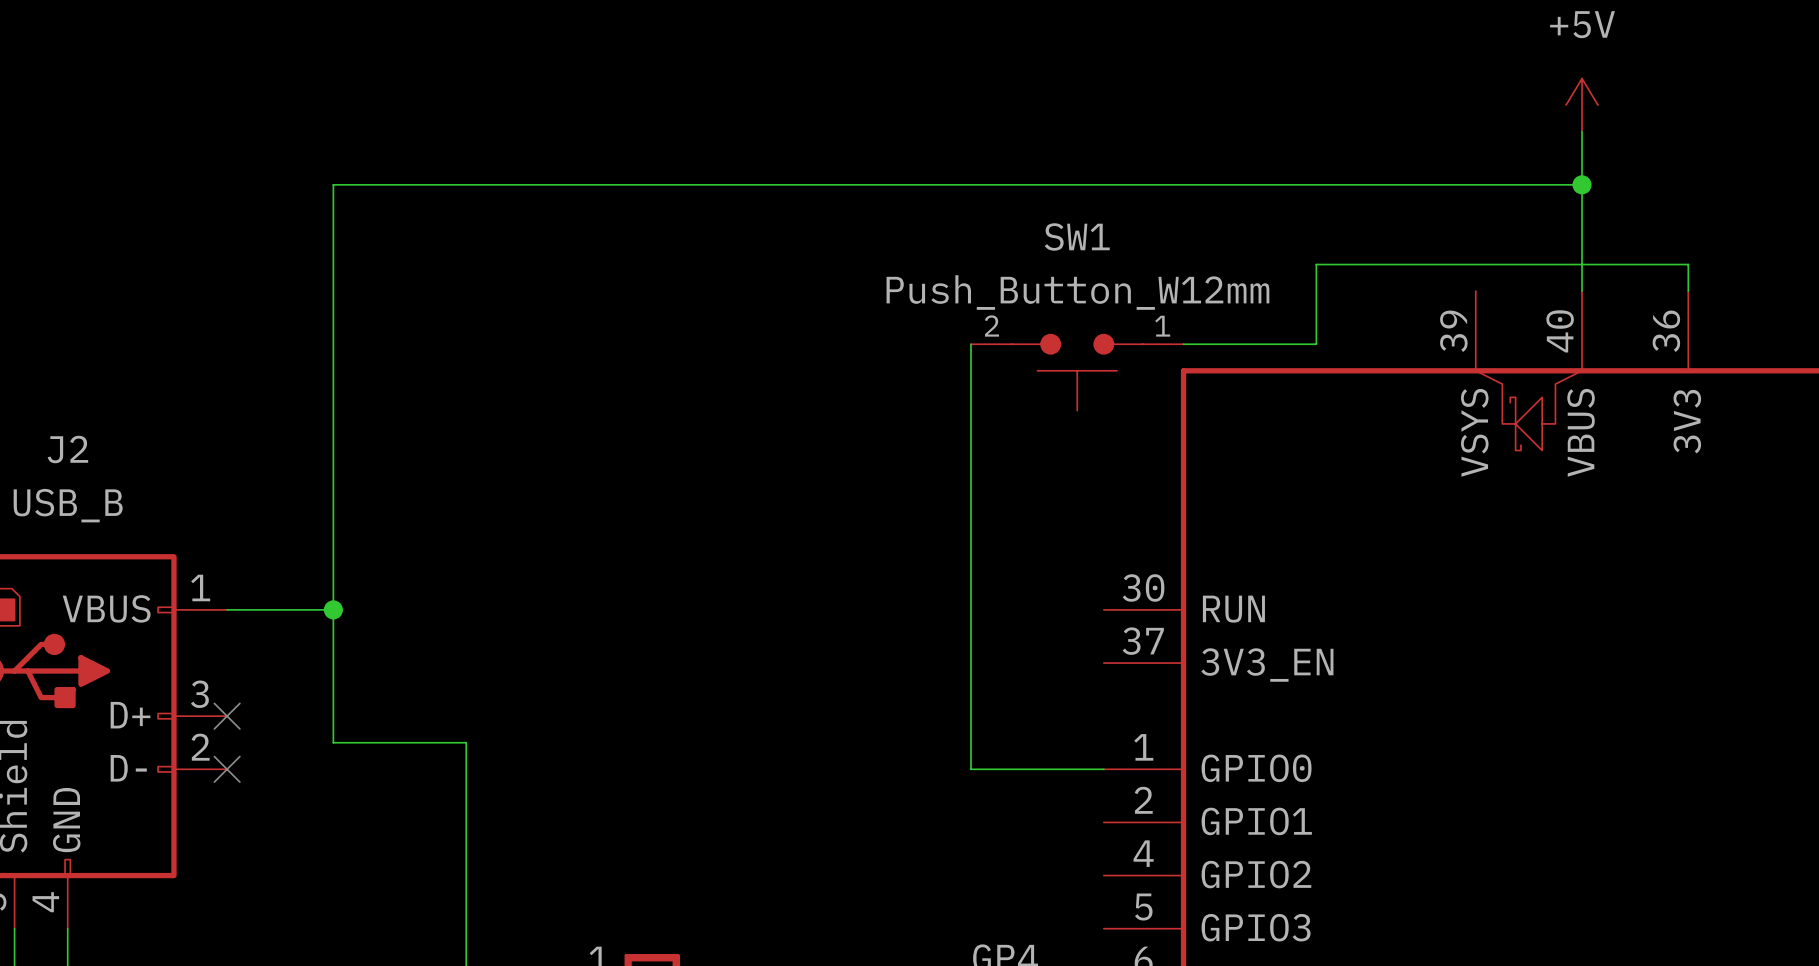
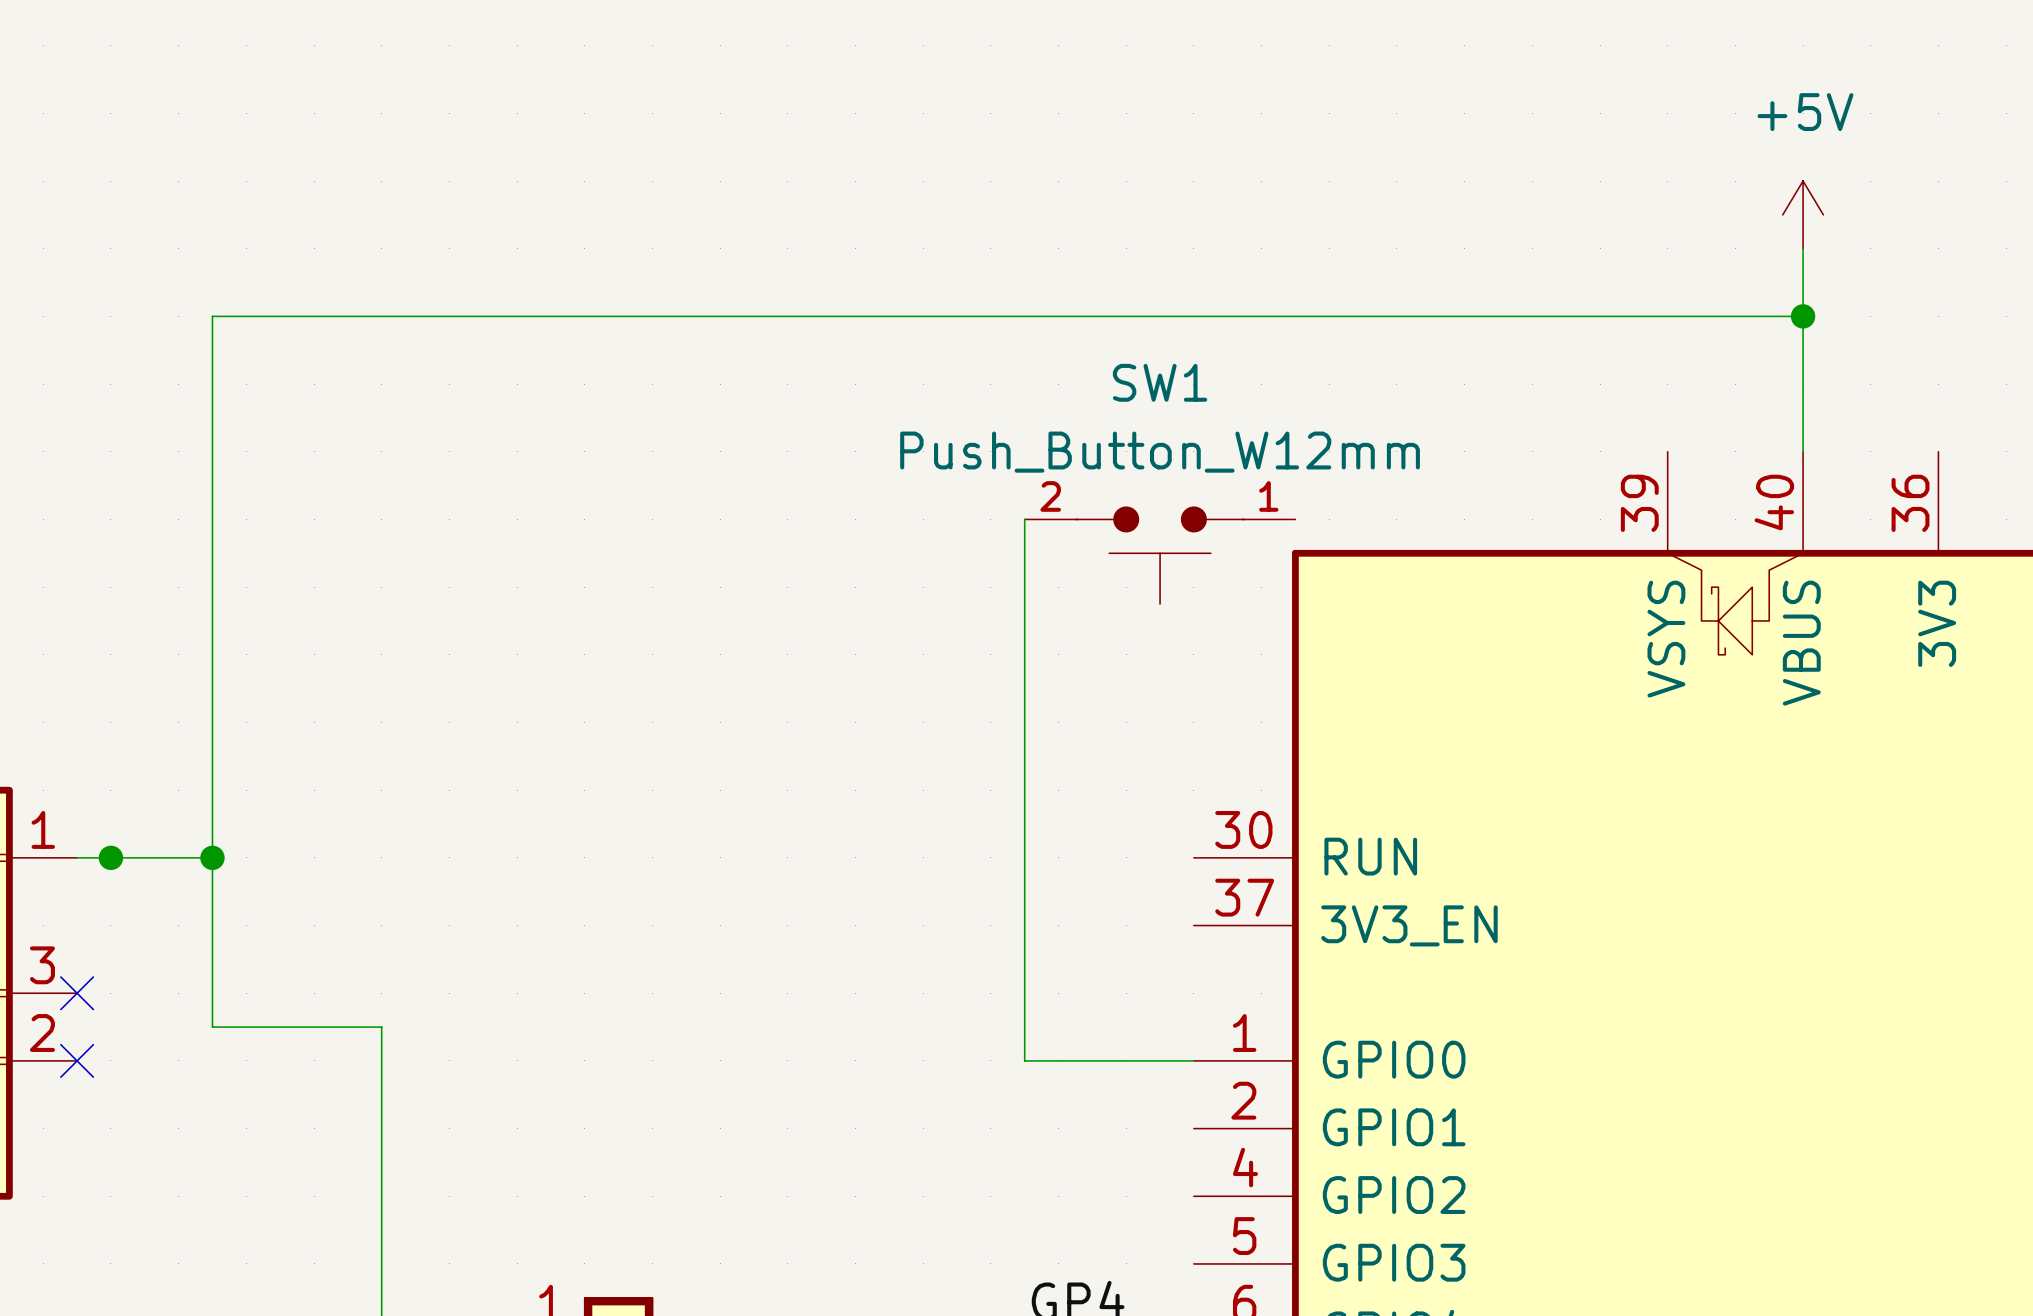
wire: (1688, 291) (1688, 264) (1316, 264) (1316, 344) (1183, 344) -> none
junction: none -> (110, 857)

